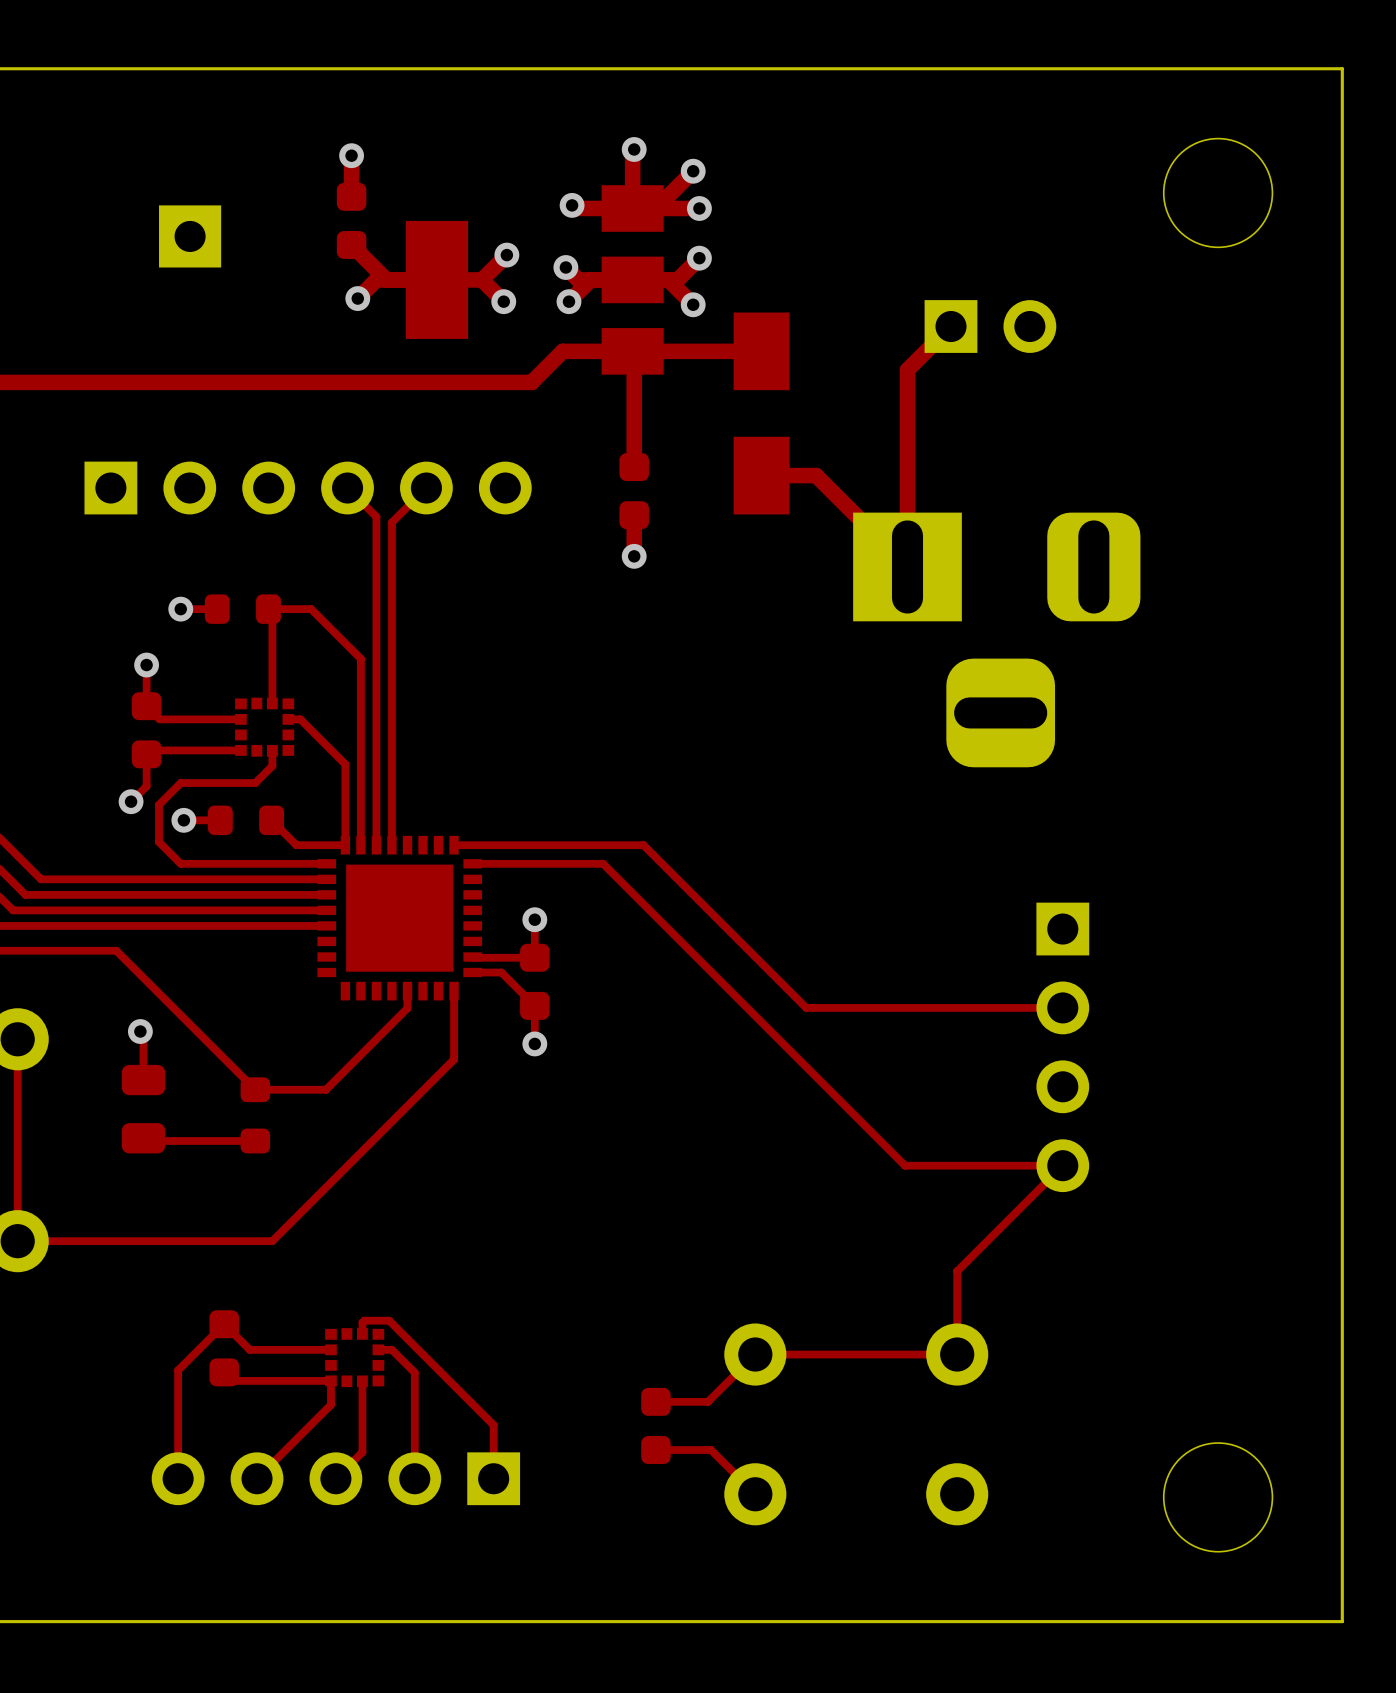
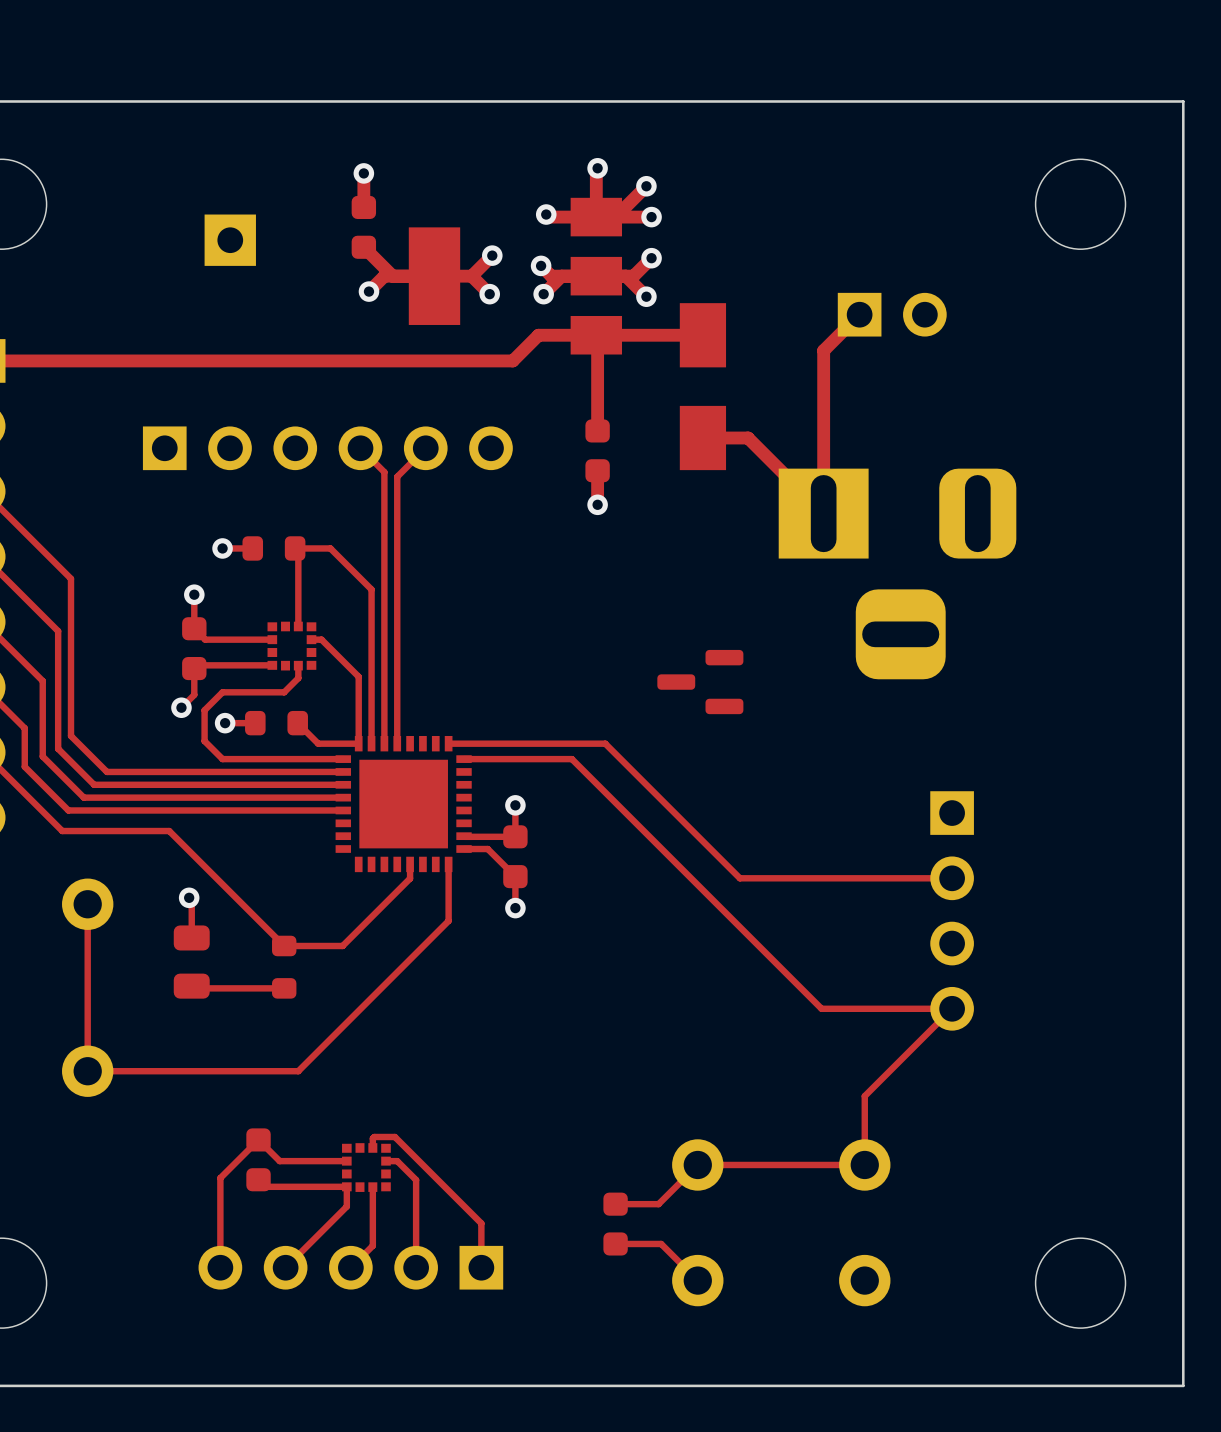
part: none -> (700, 682)

